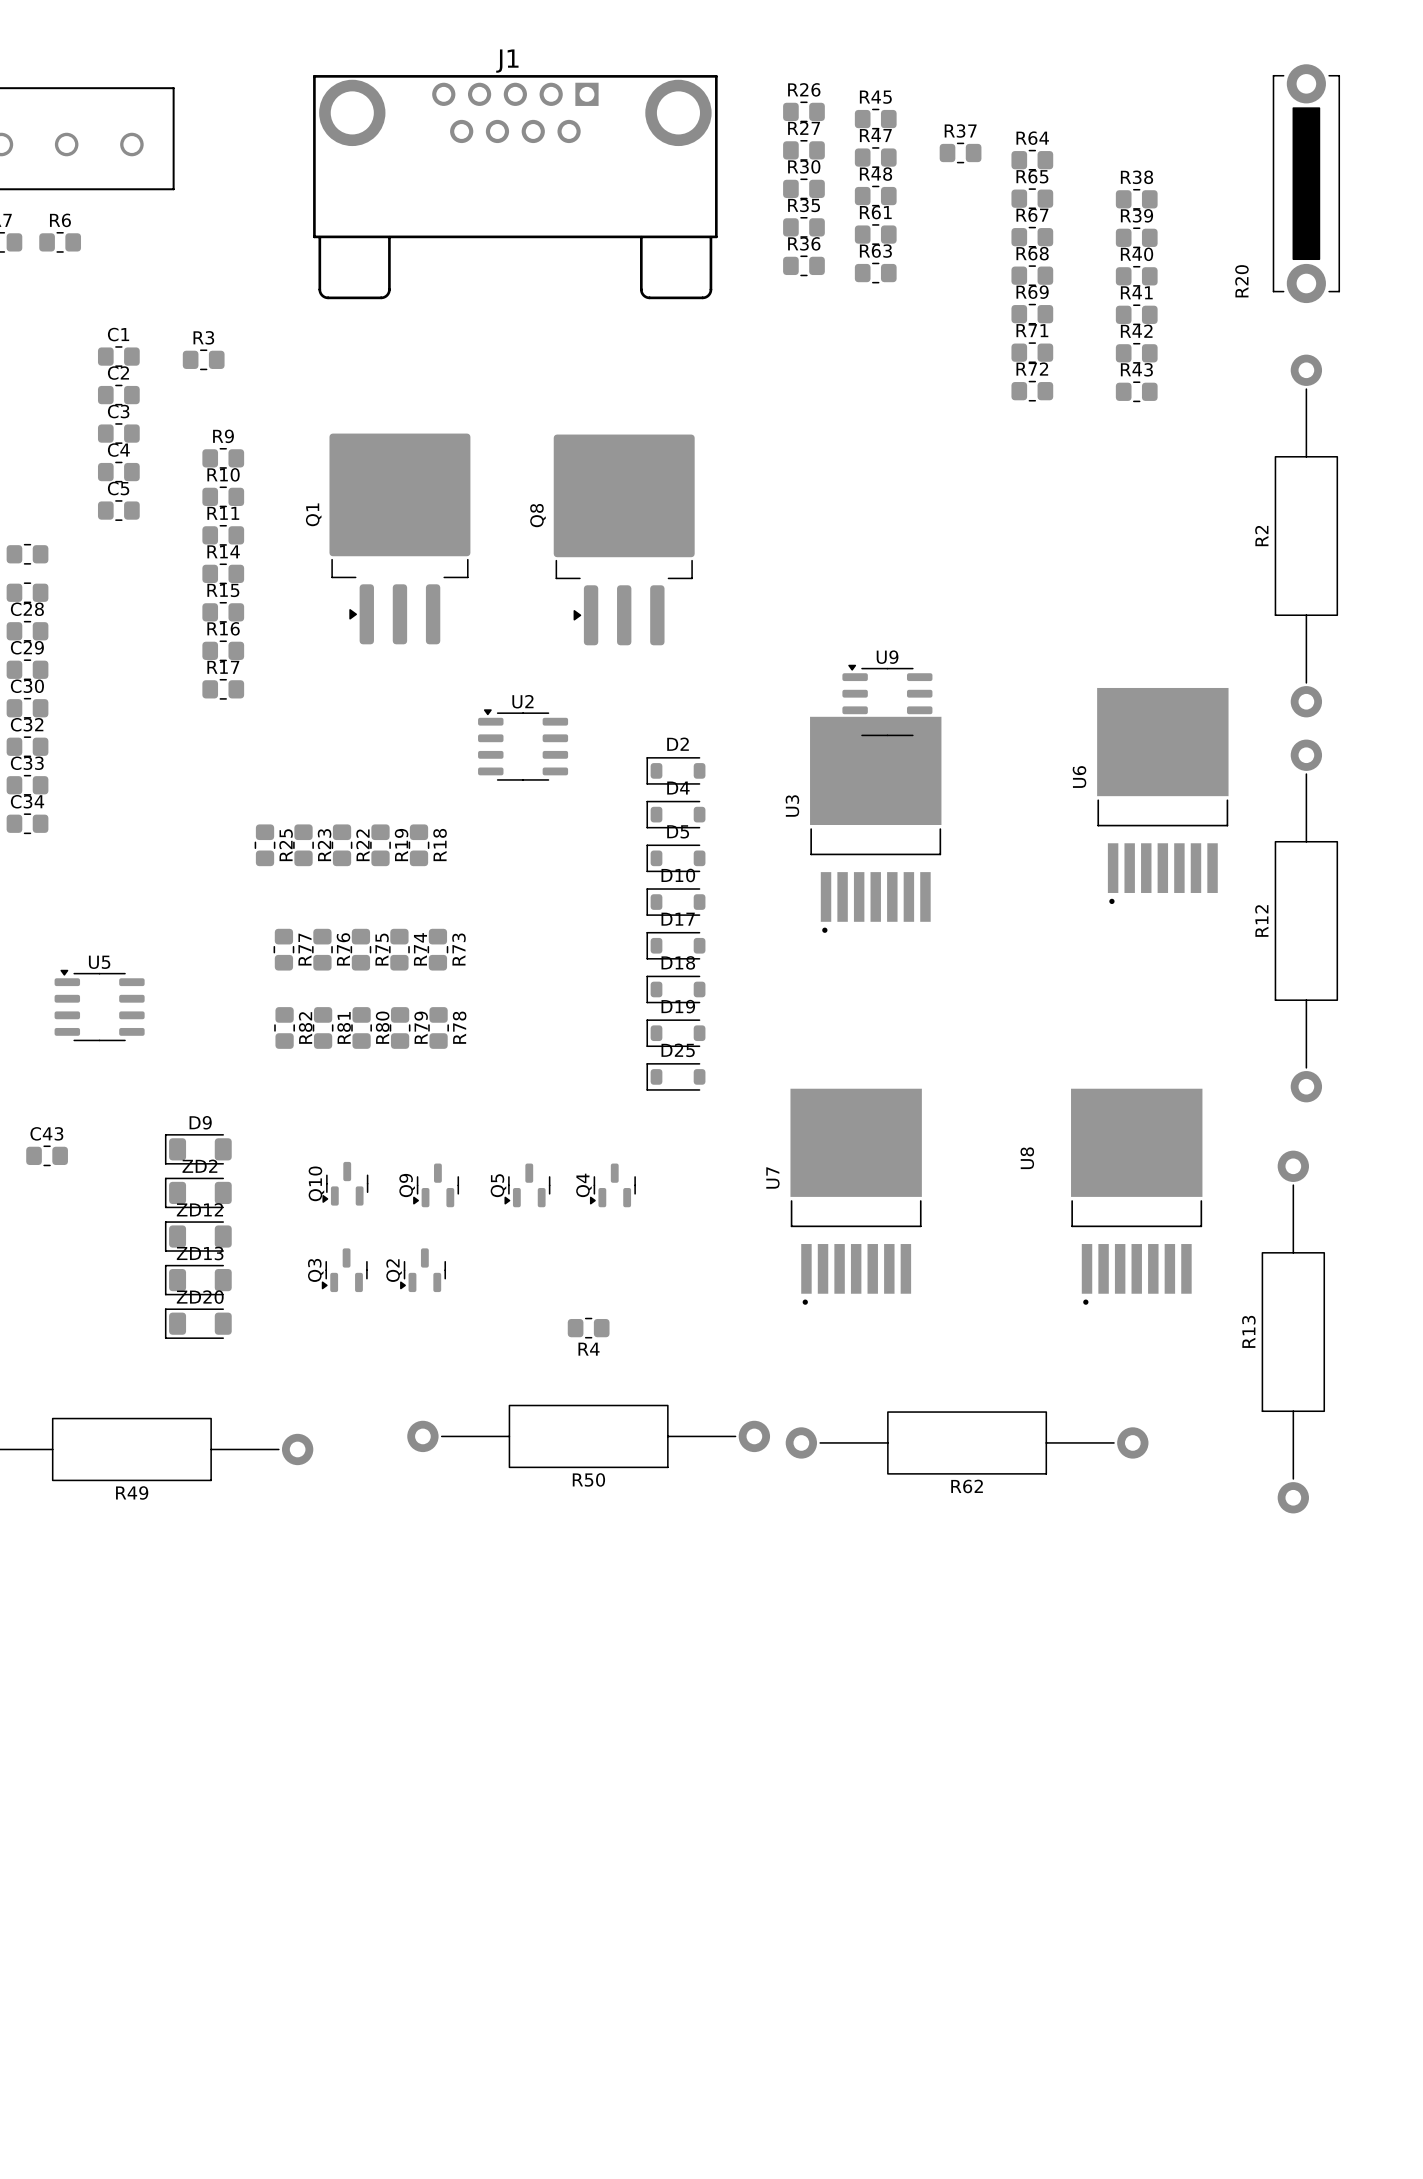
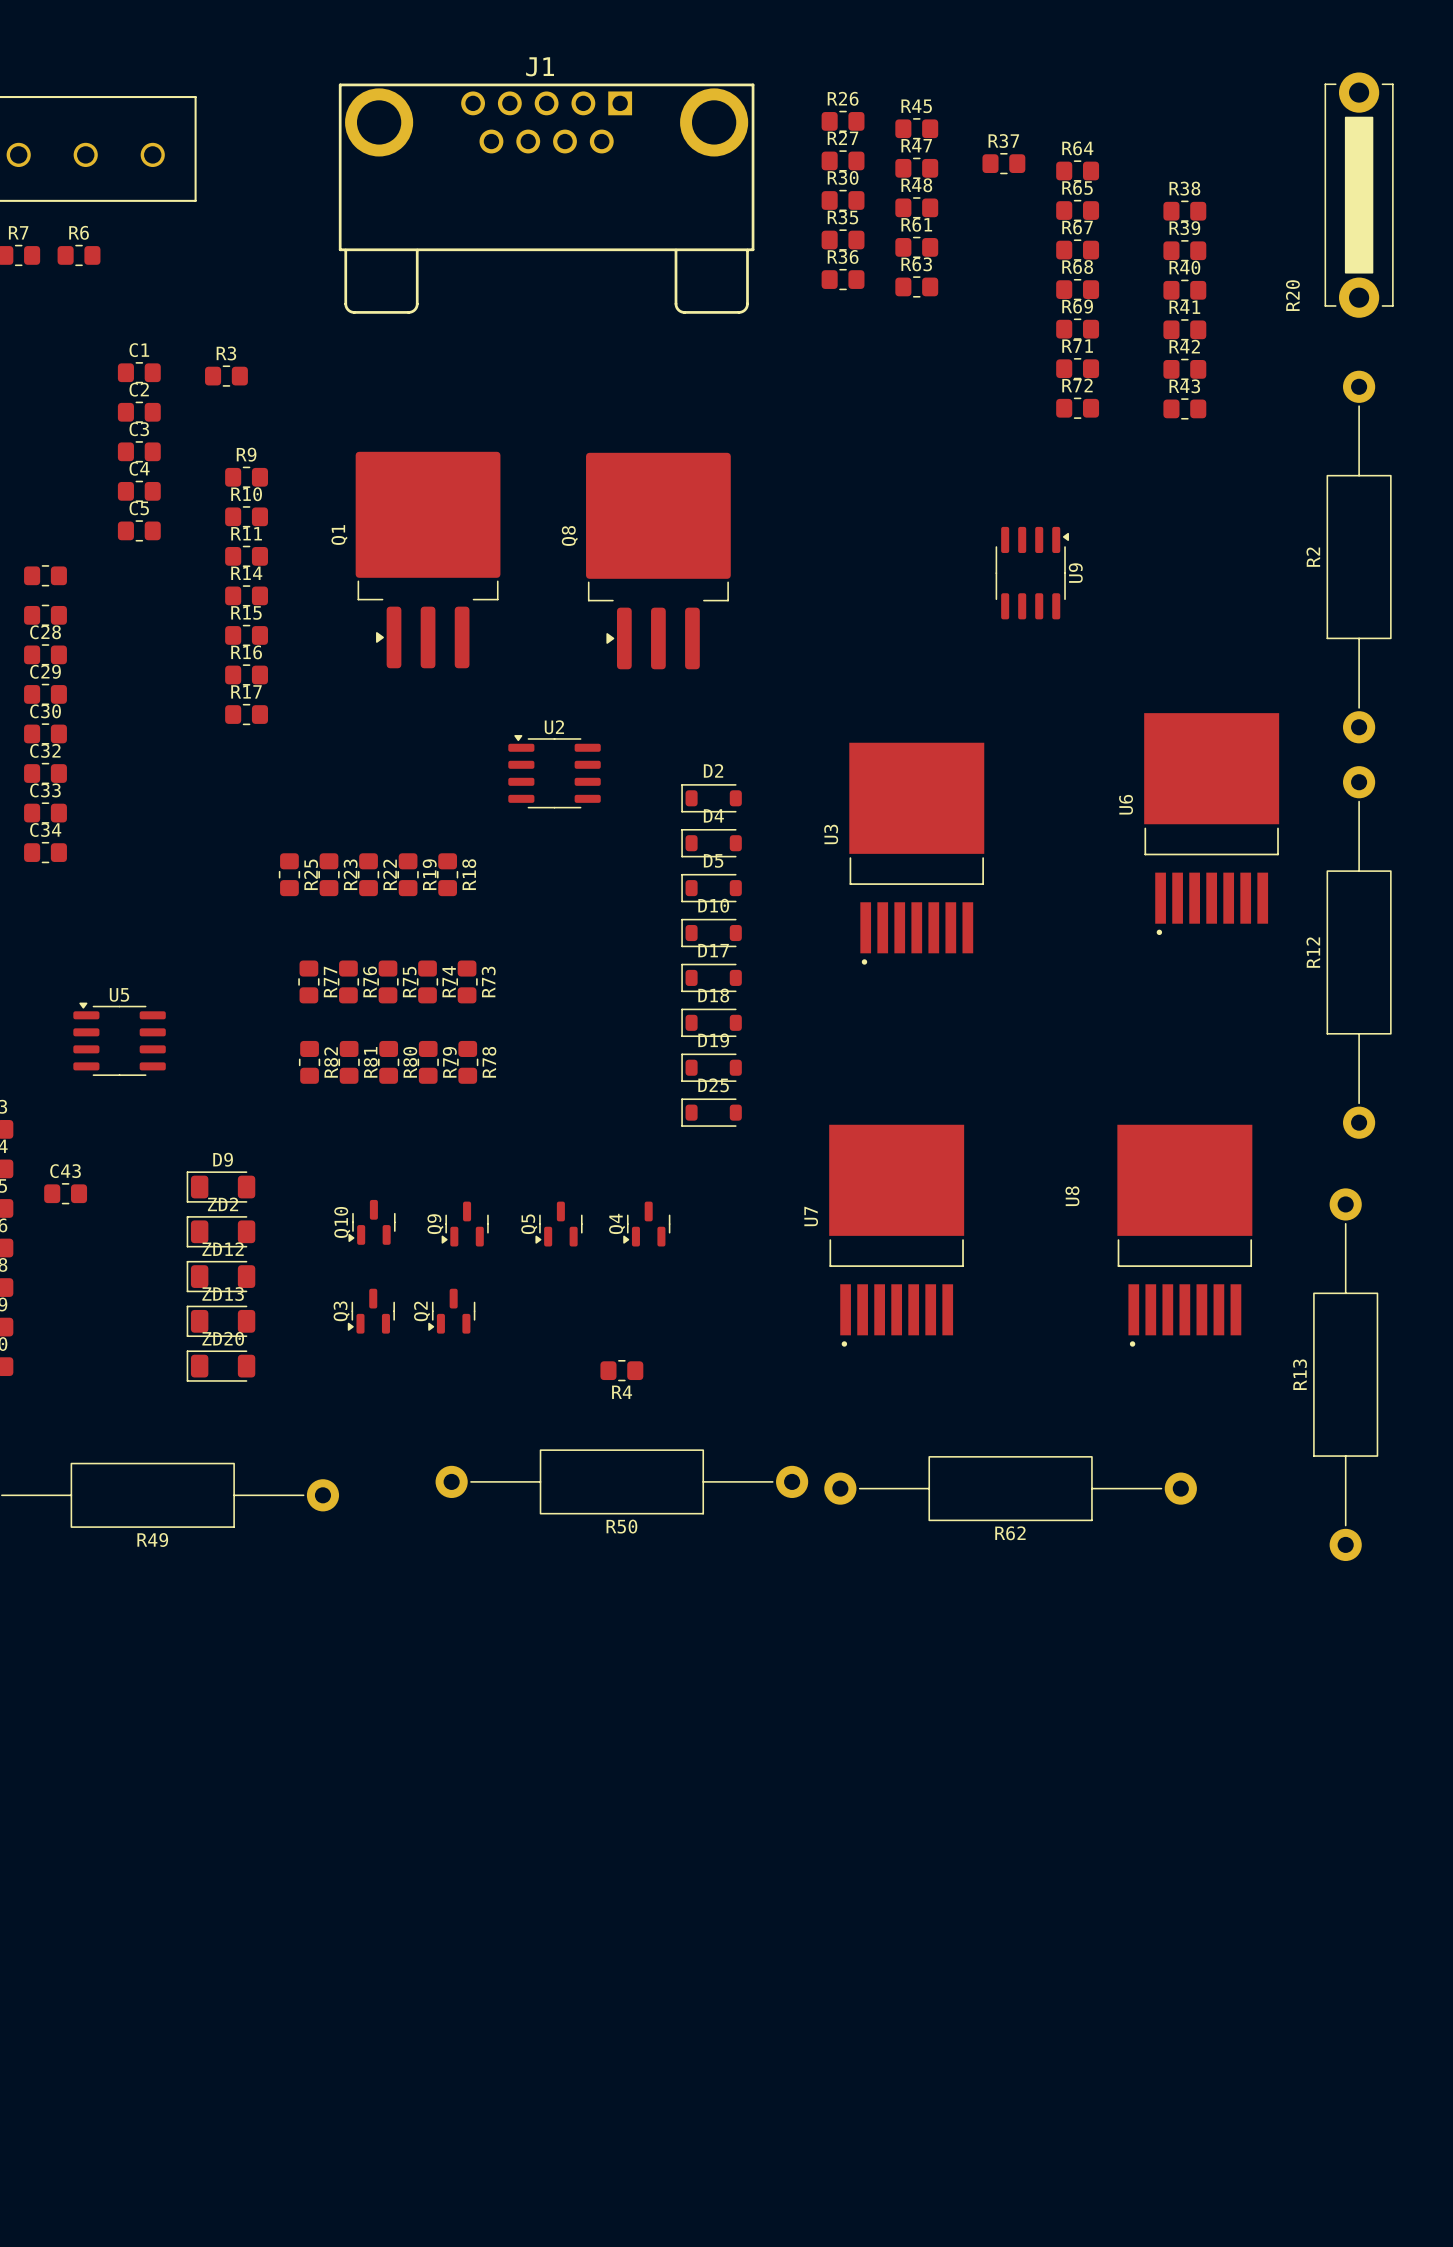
U9 rotation: 0° (887, 700) -> 90° clockwise (1032, 573)
U9 position: (887, 700) -> (1032, 573)

